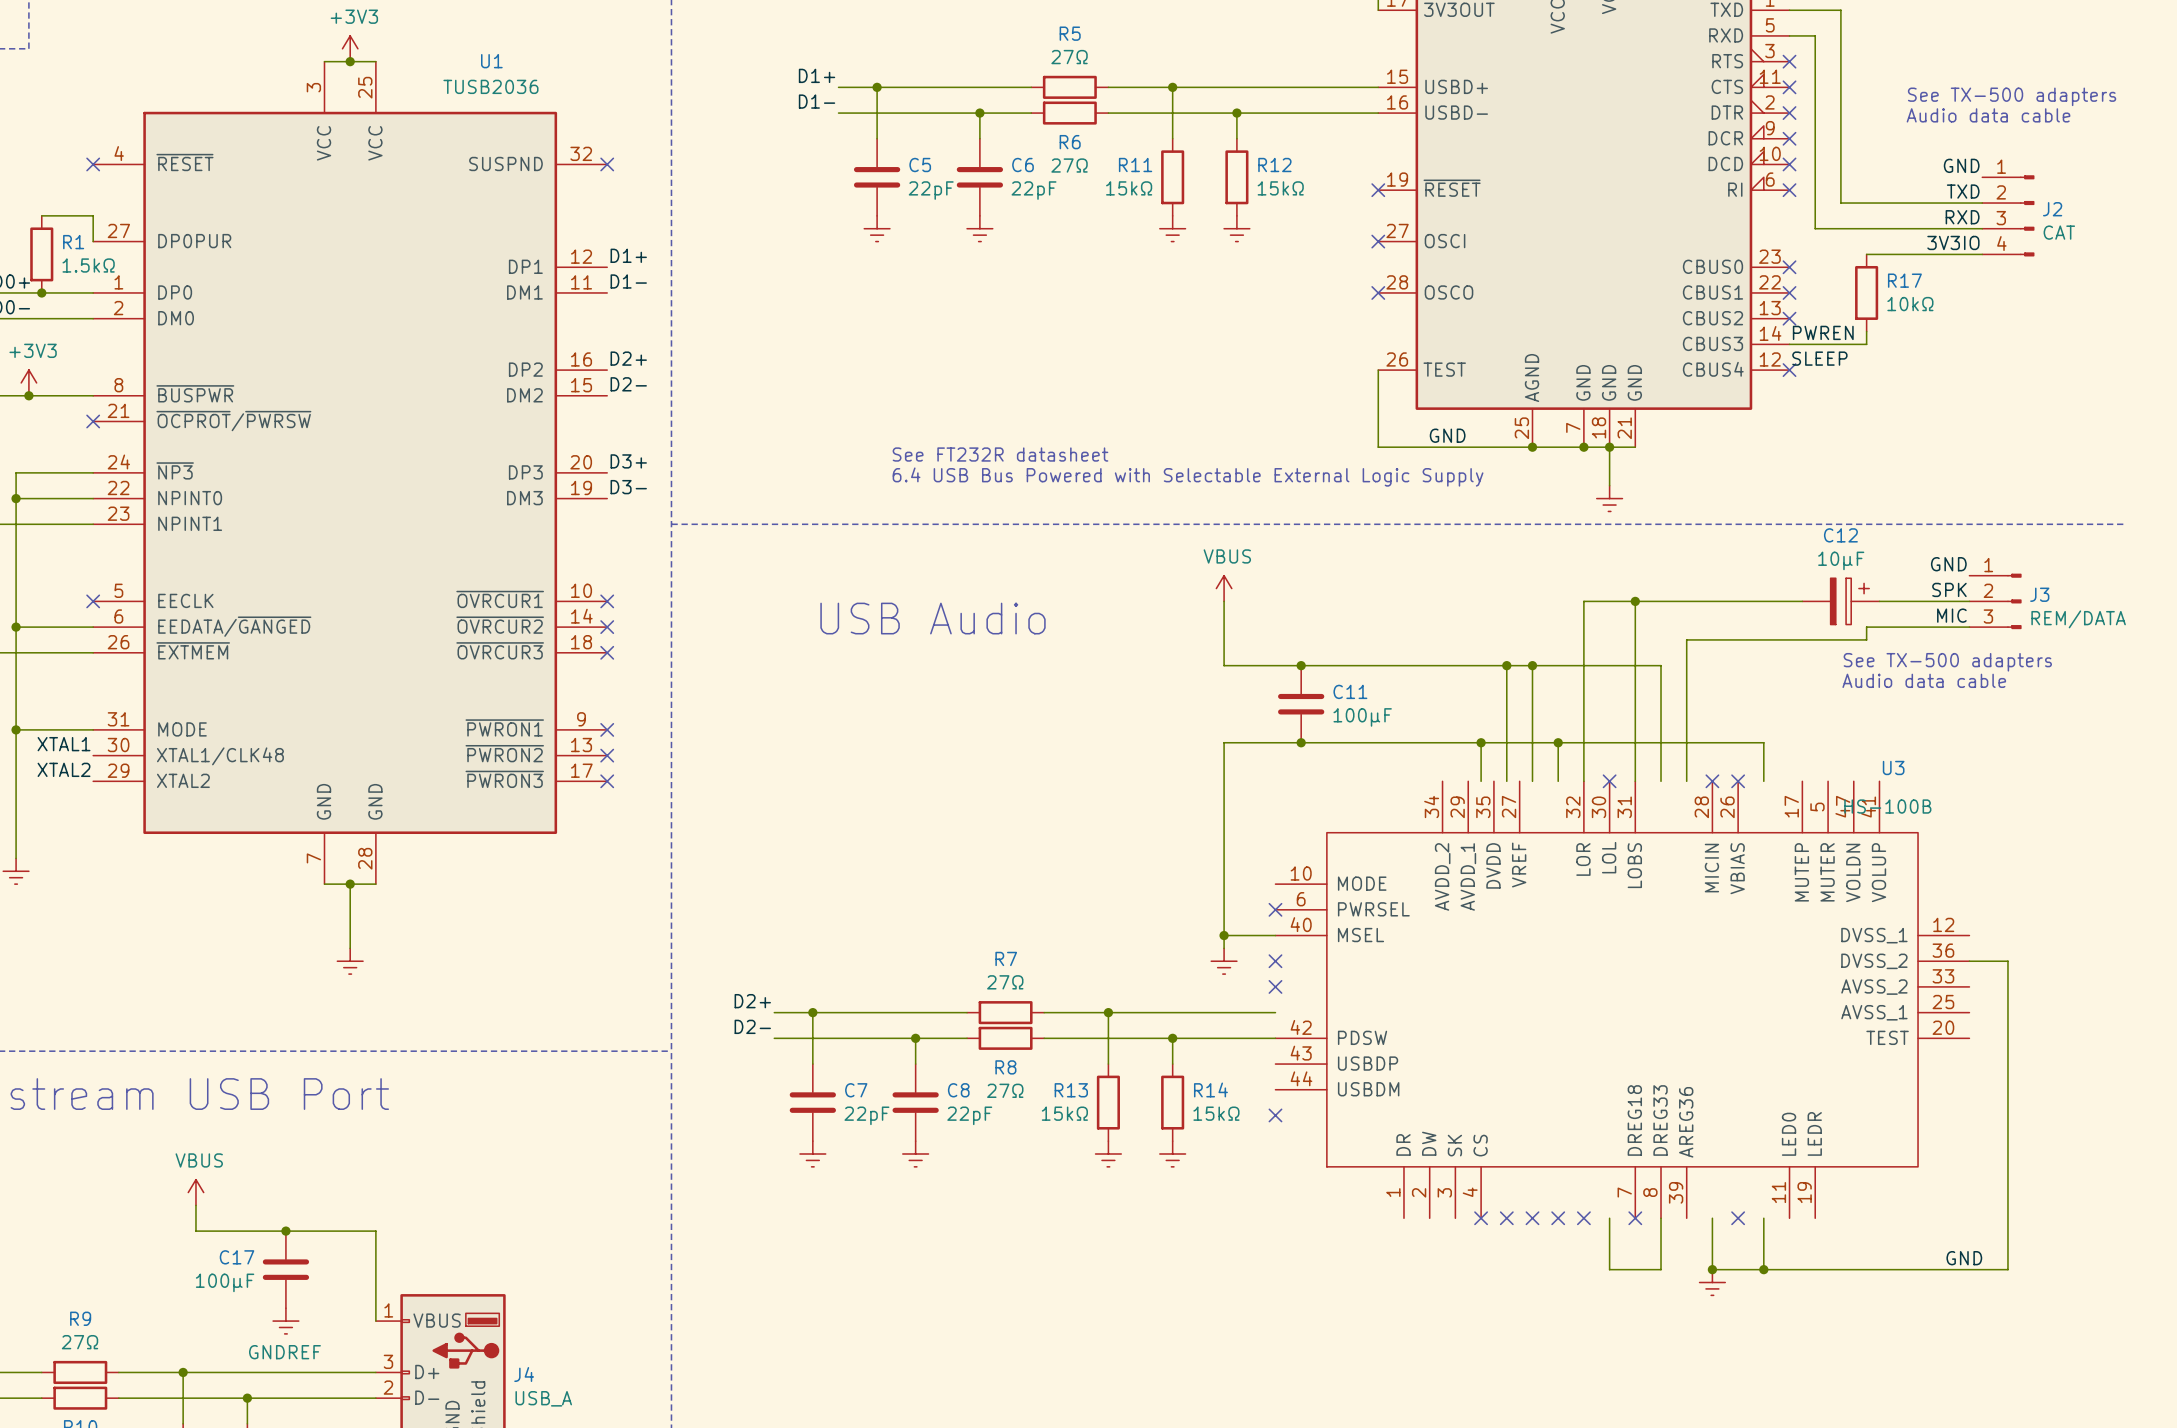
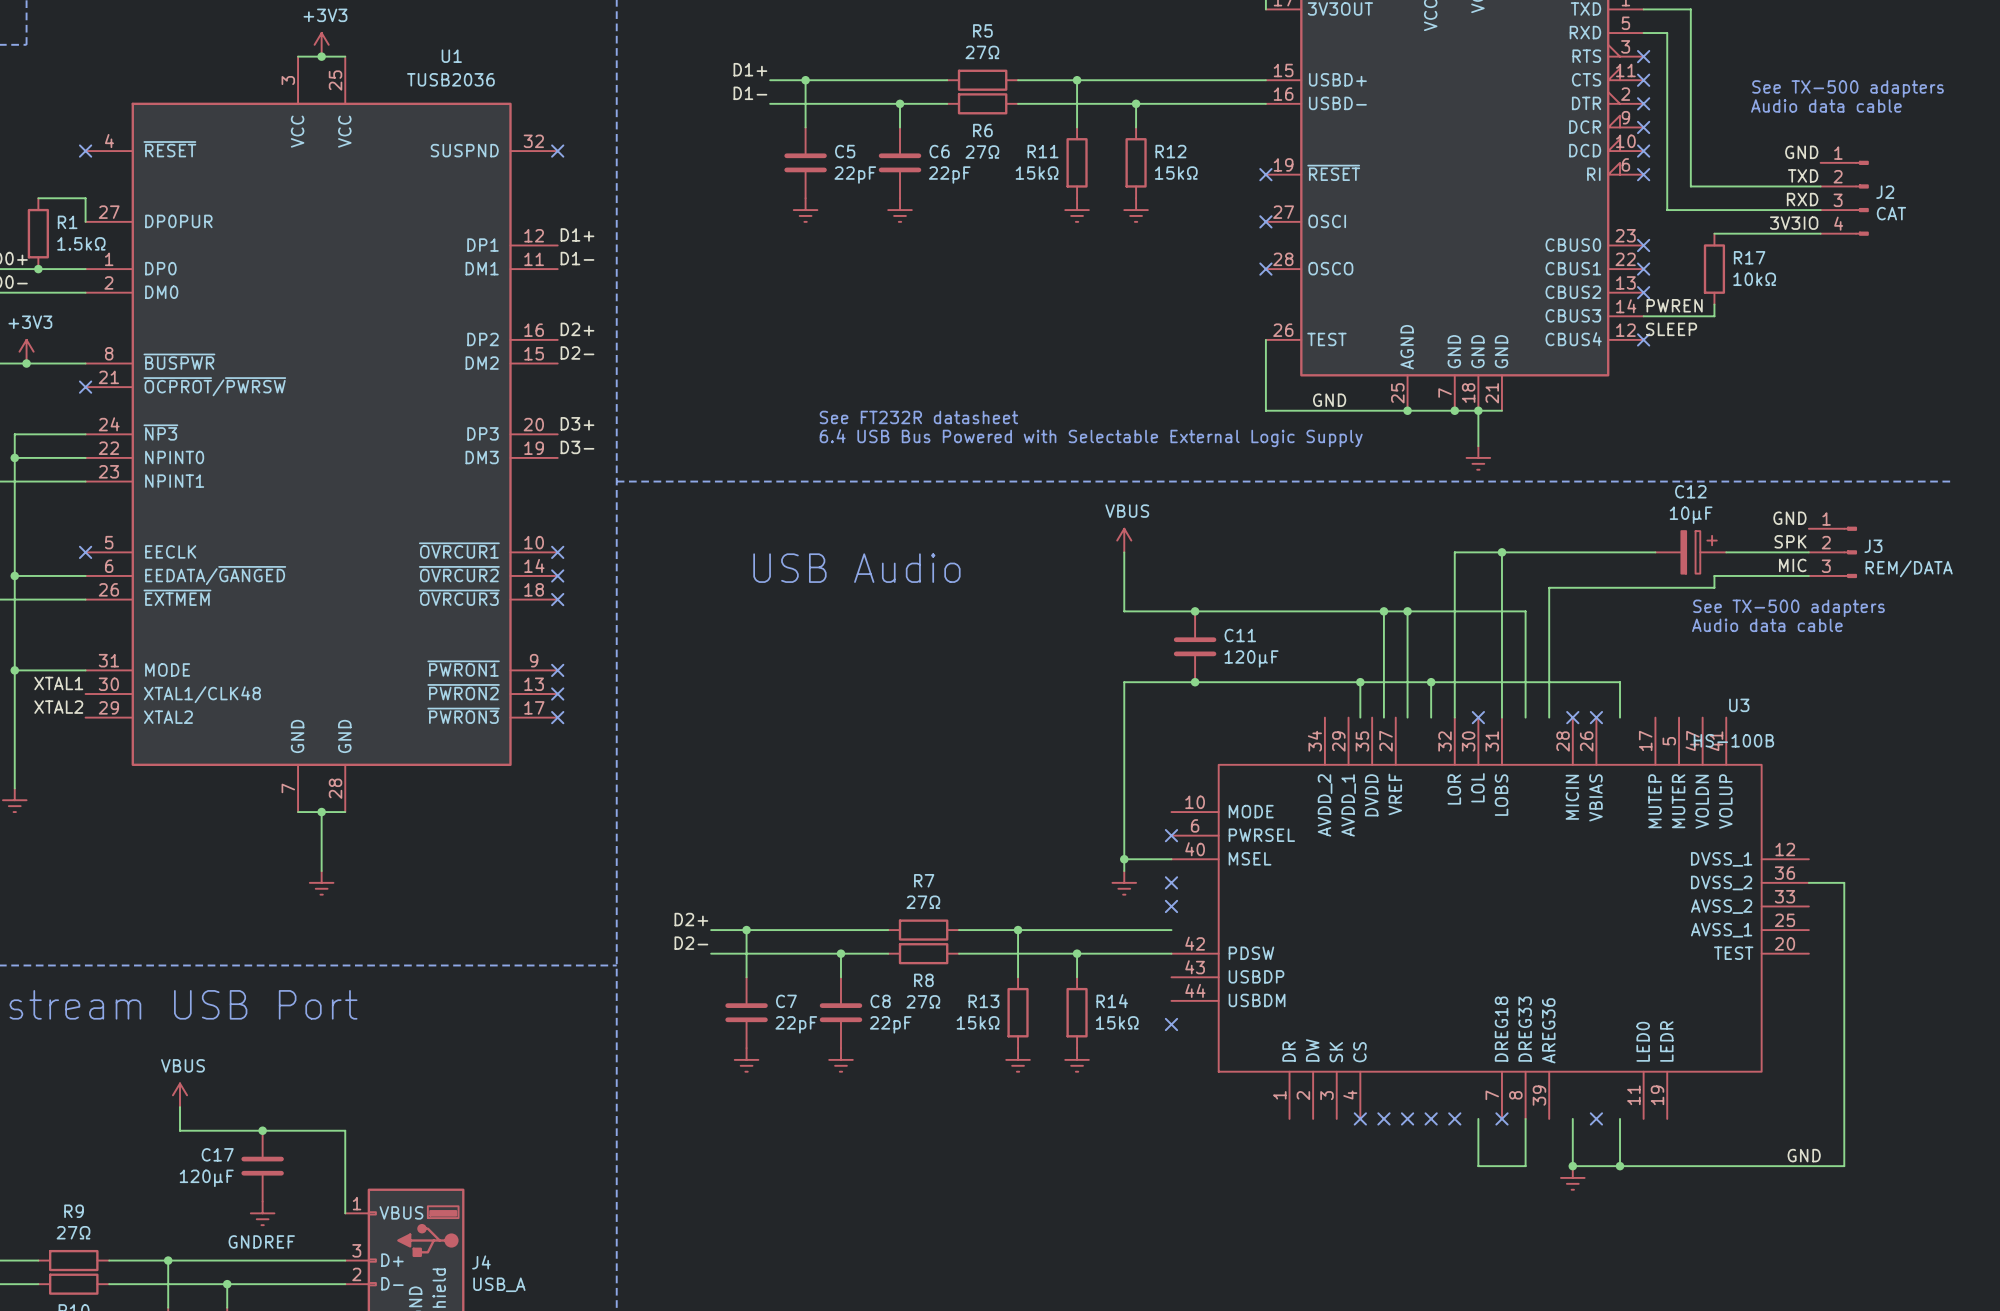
C11 value: 100μF (1362, 717) -> 120μF (1251, 658)
C17 value: 100μF (225, 1282) -> 120μF (206, 1178)

